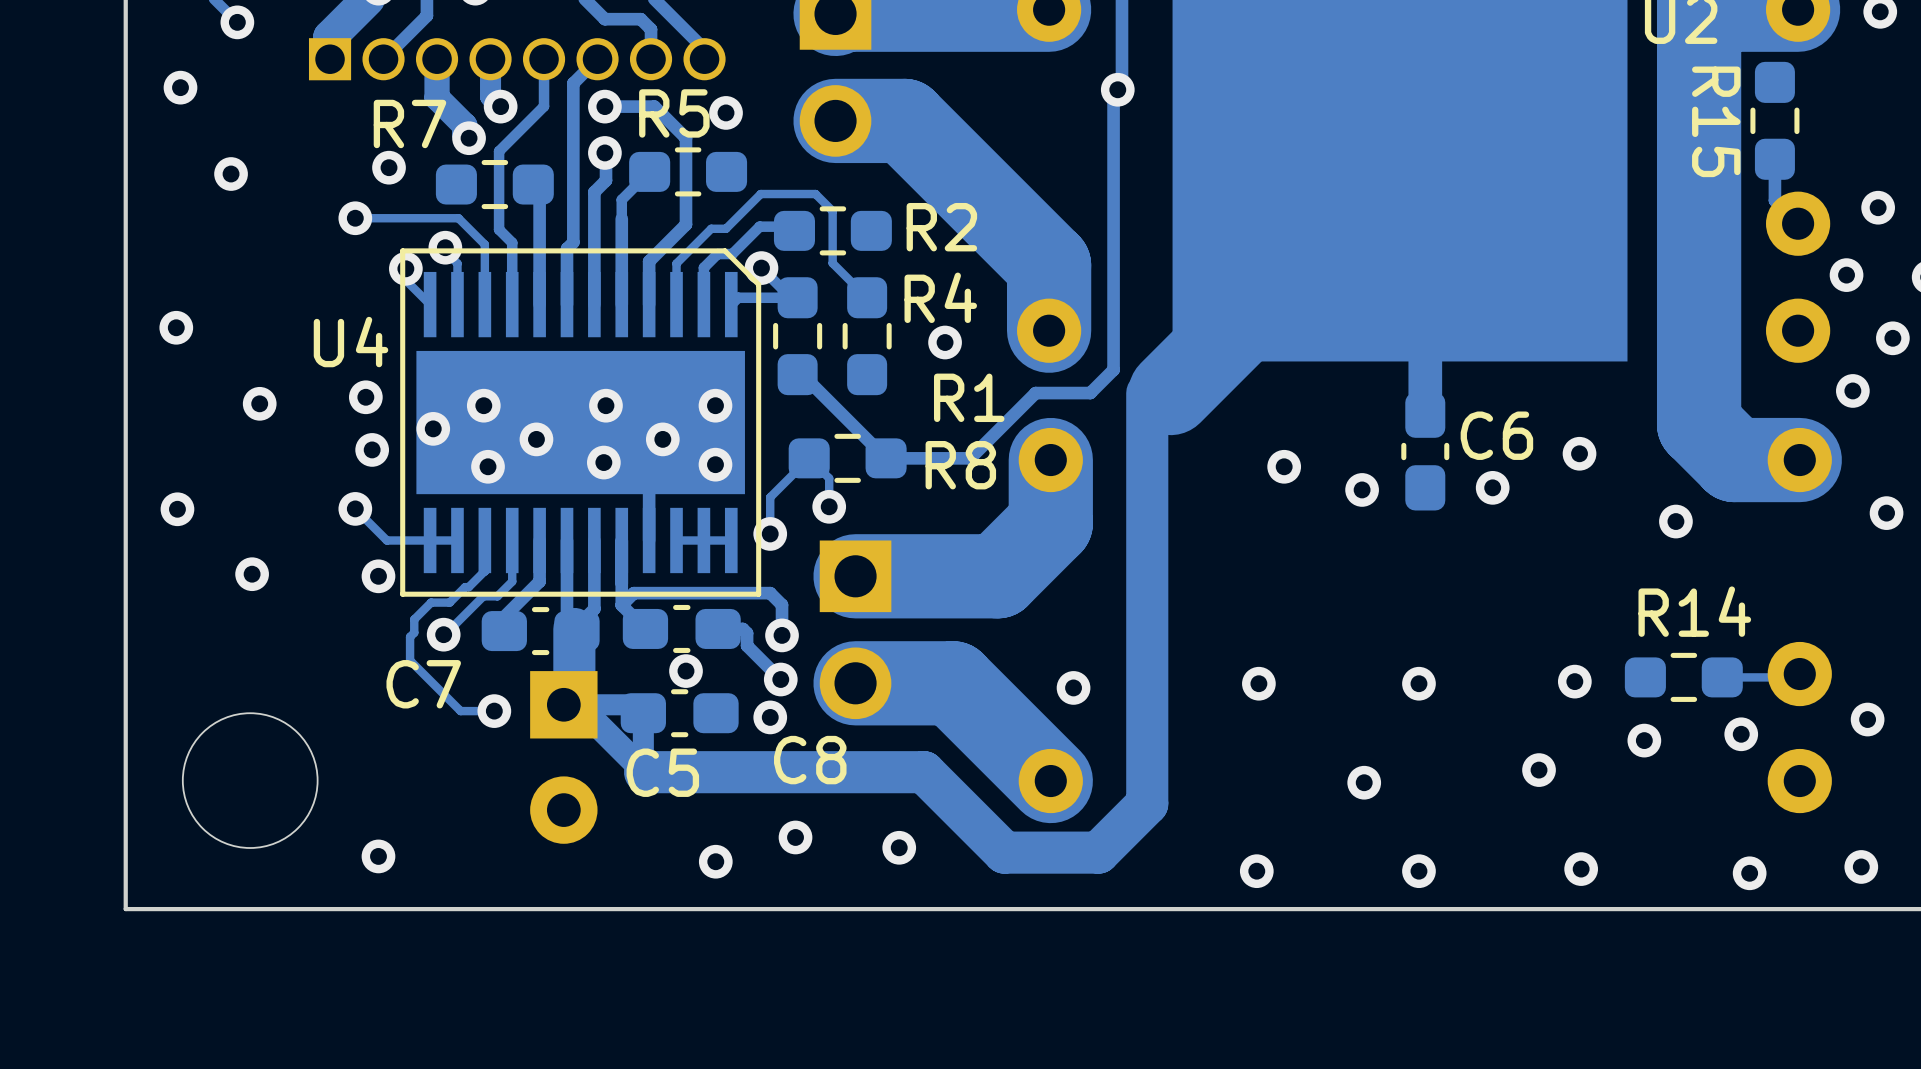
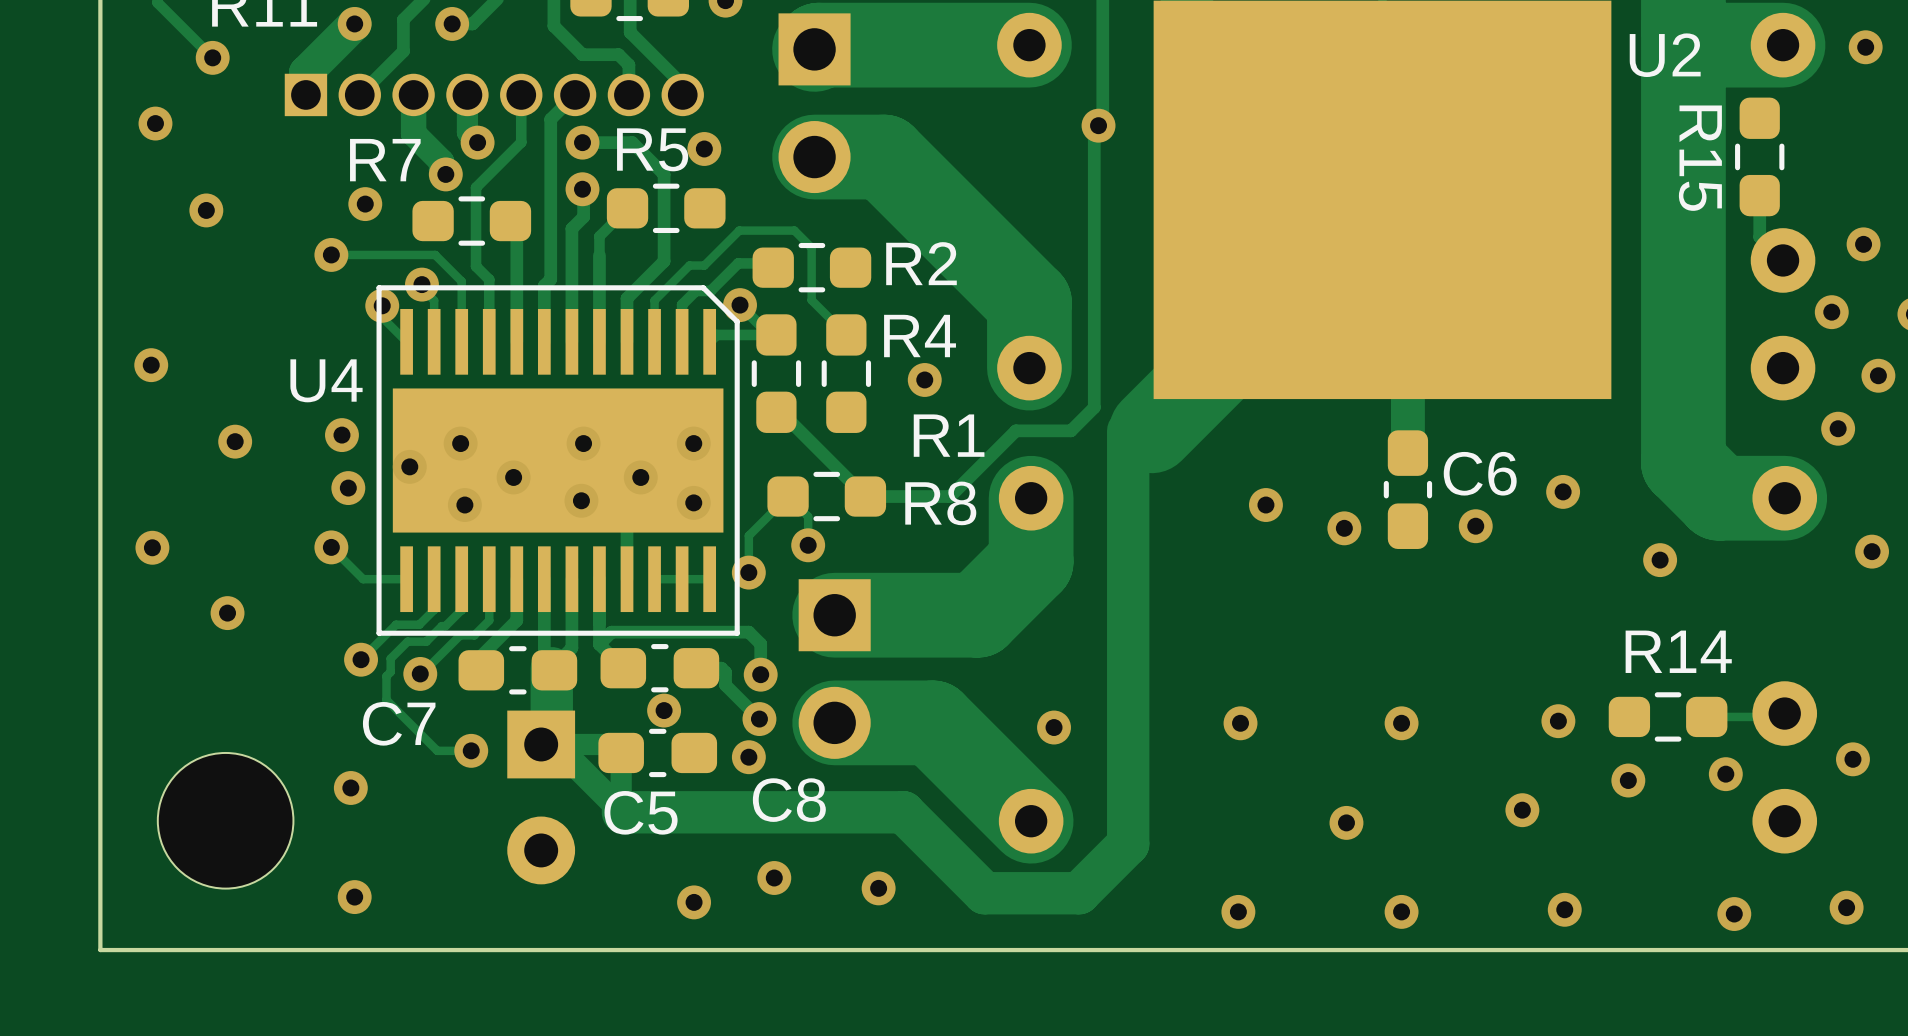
track: (457, 540) (430, 540) -> (434, 579) (434, 609) (419, 624) (396, 624) (361, 659)
via position: (378, 576) -> (361, 659)
via: none -> (350, 787)

